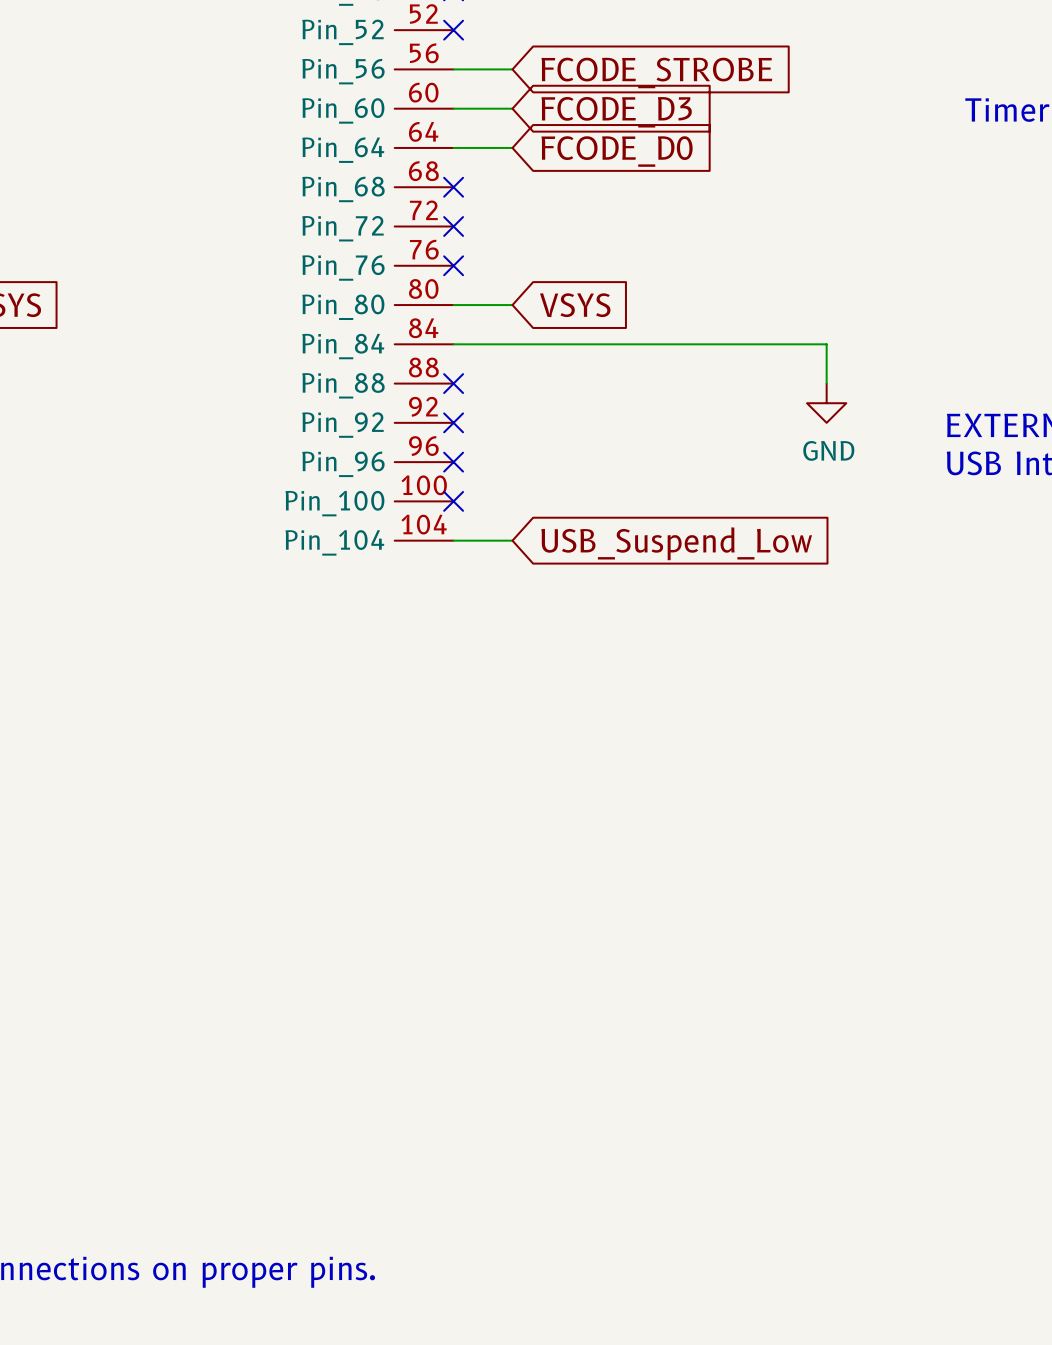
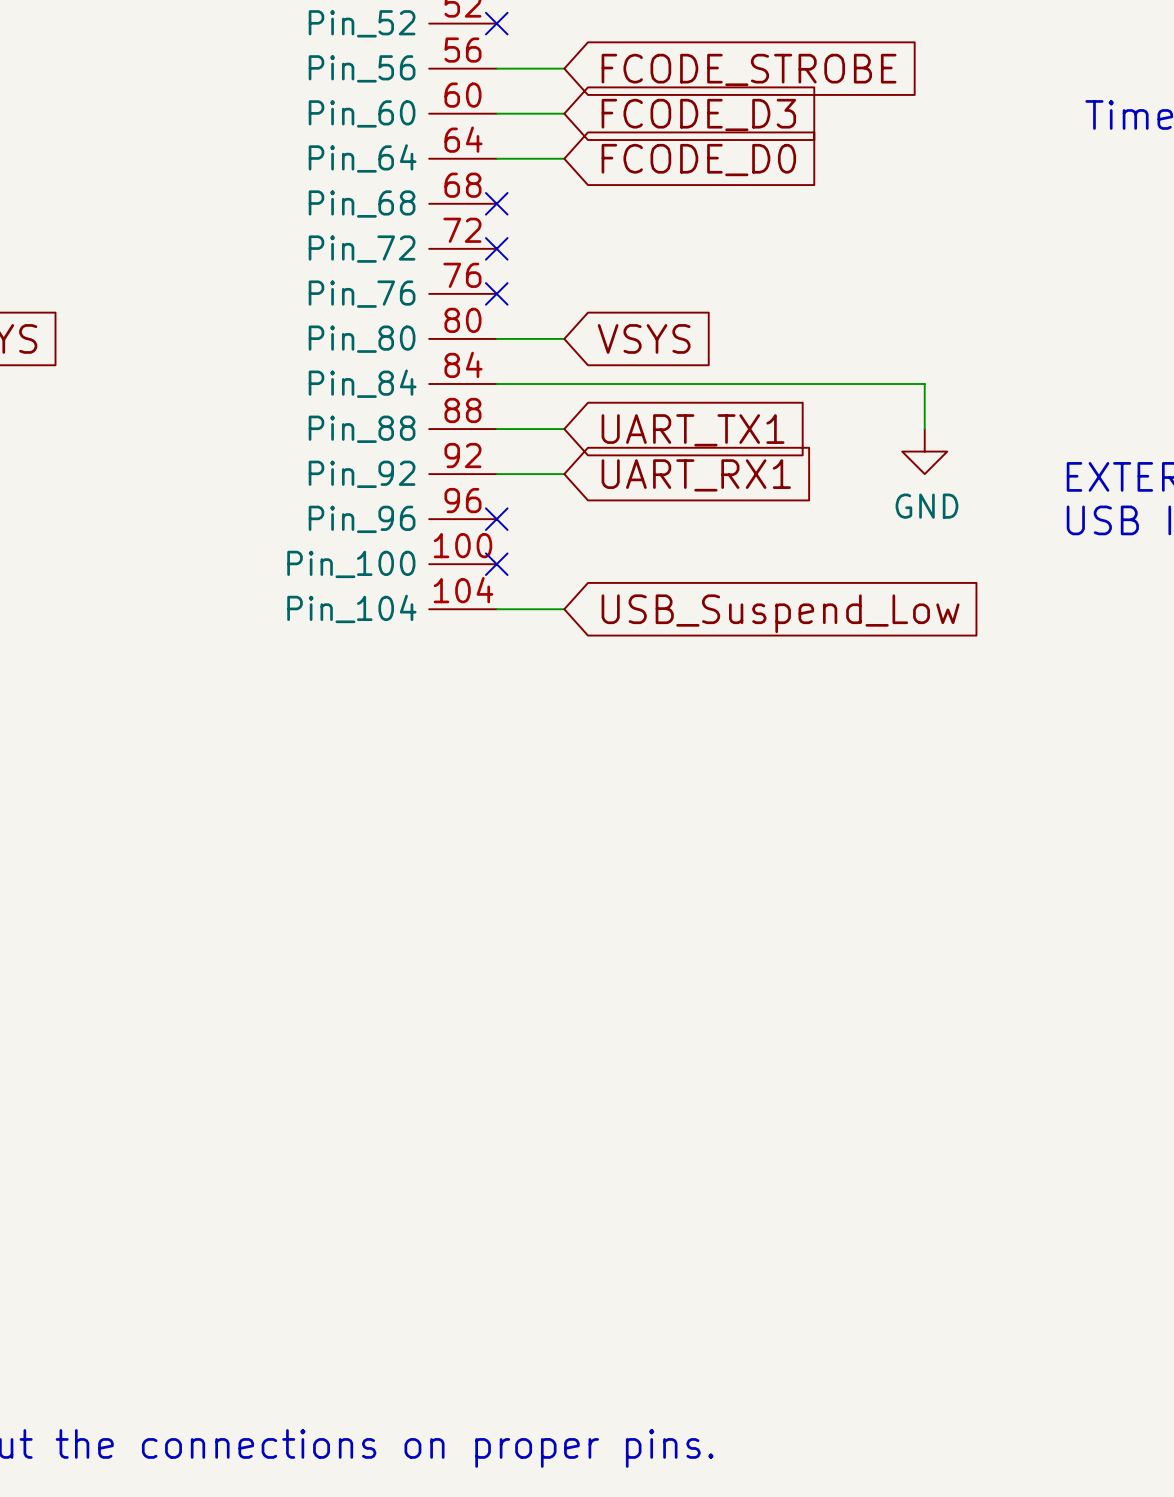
wire: none -> (496, 429) (564, 429)
no-connect mark: (453, 383) -> none
global label: none -> UART_TX1 (693, 430)
wire: none -> (496, 474) (564, 474)
no-connect mark: (453, 422) -> none
global label: none -> UART_RX1 (696, 475)

